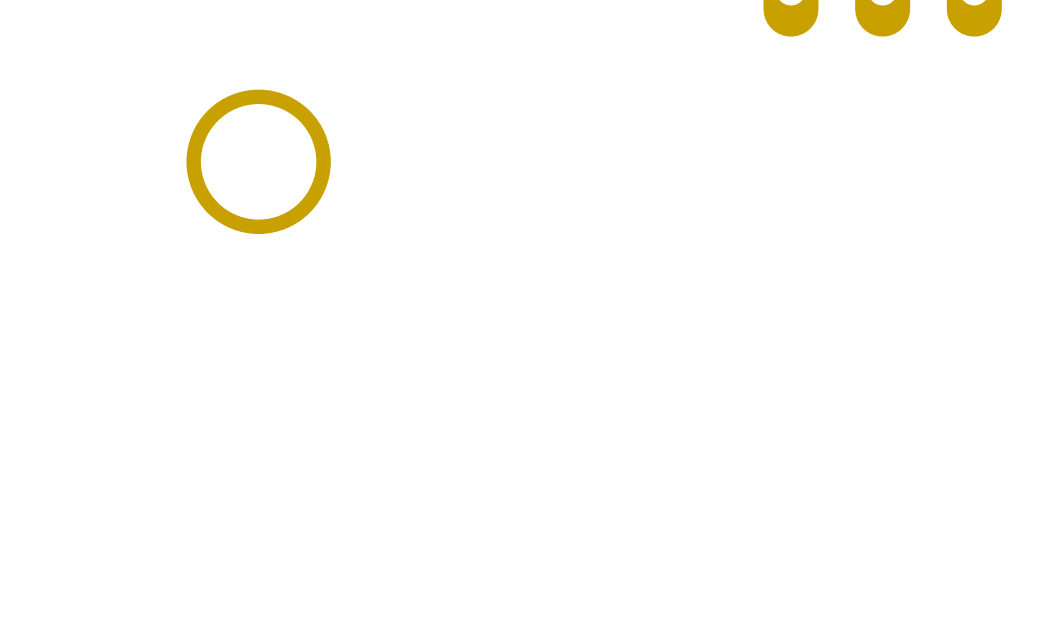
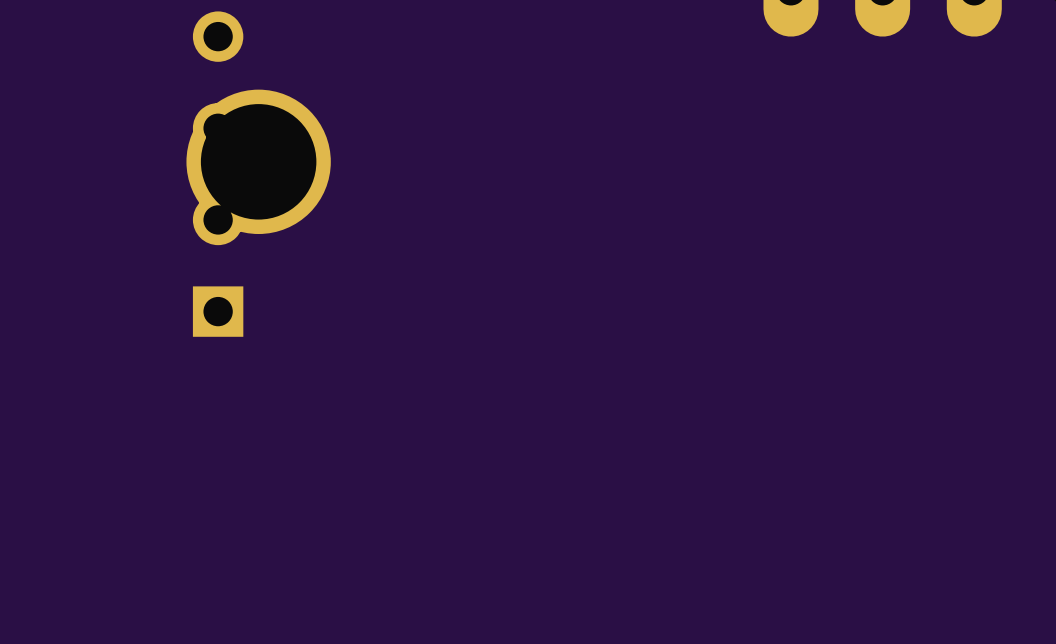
part: none -> (218, 174)

